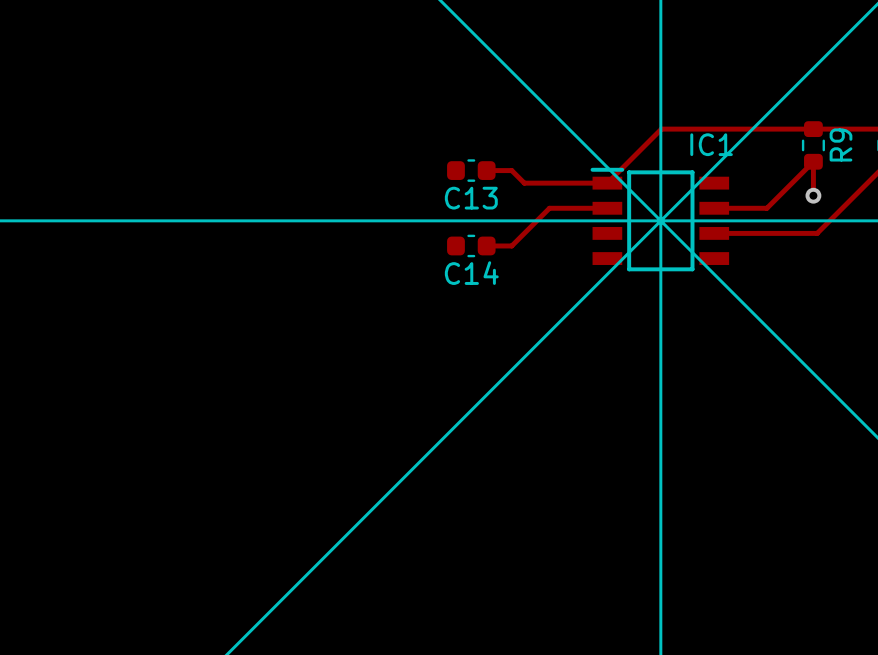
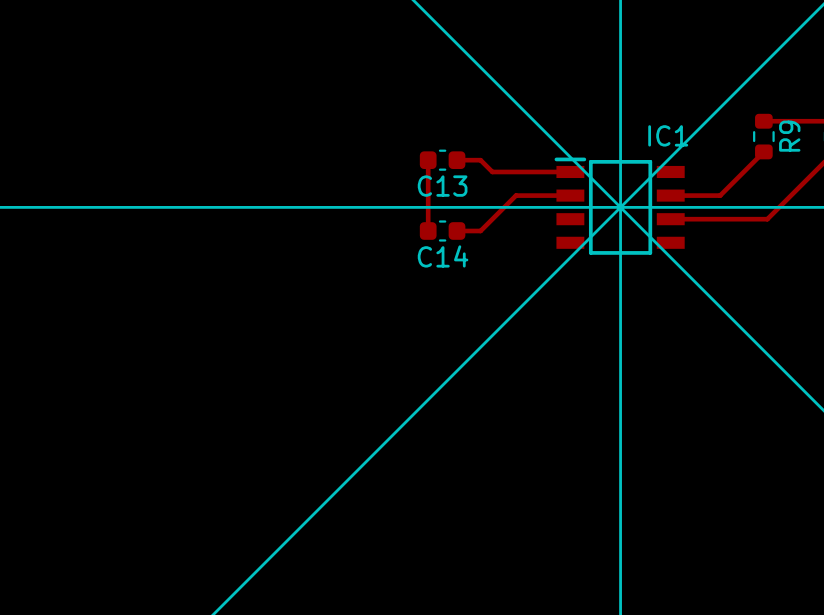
track: (813, 129) (661, 129) (607, 183) -> none
track: (813, 161) (813, 195) -> none
track: none -> (428, 160) (428, 230)
via: (813, 195) -> none

